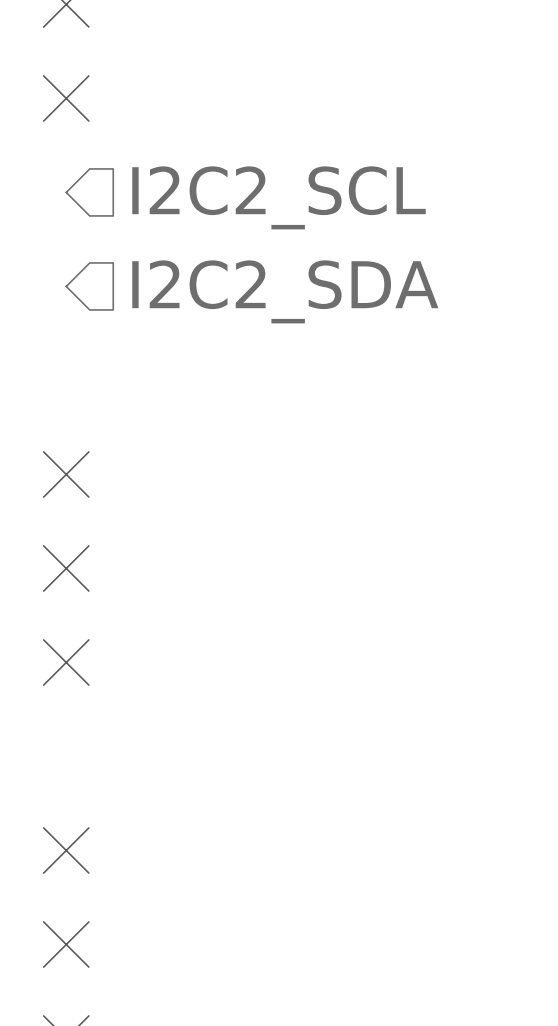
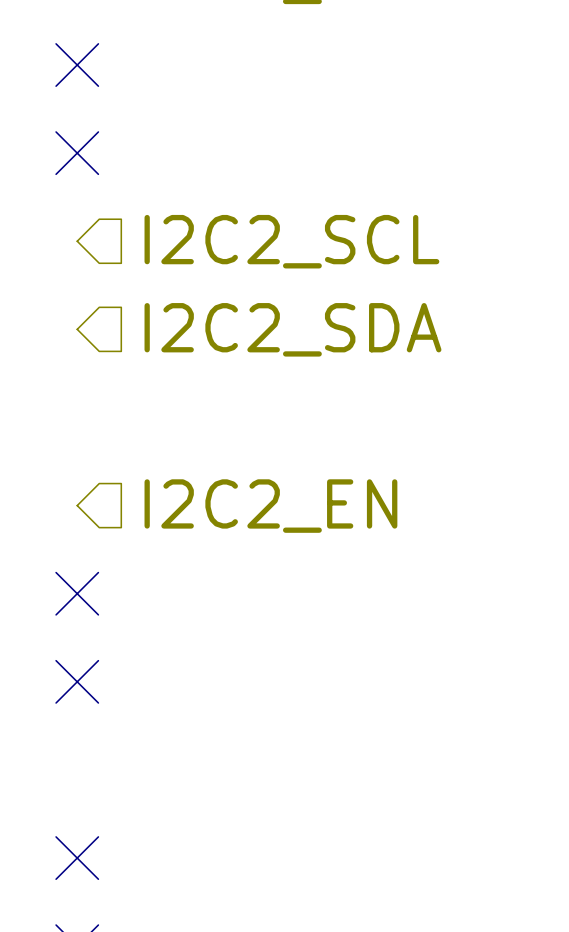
no-connect mark: (66, 474) -> none
hierarchical label: none -> I2C2_EN (270, 506)

